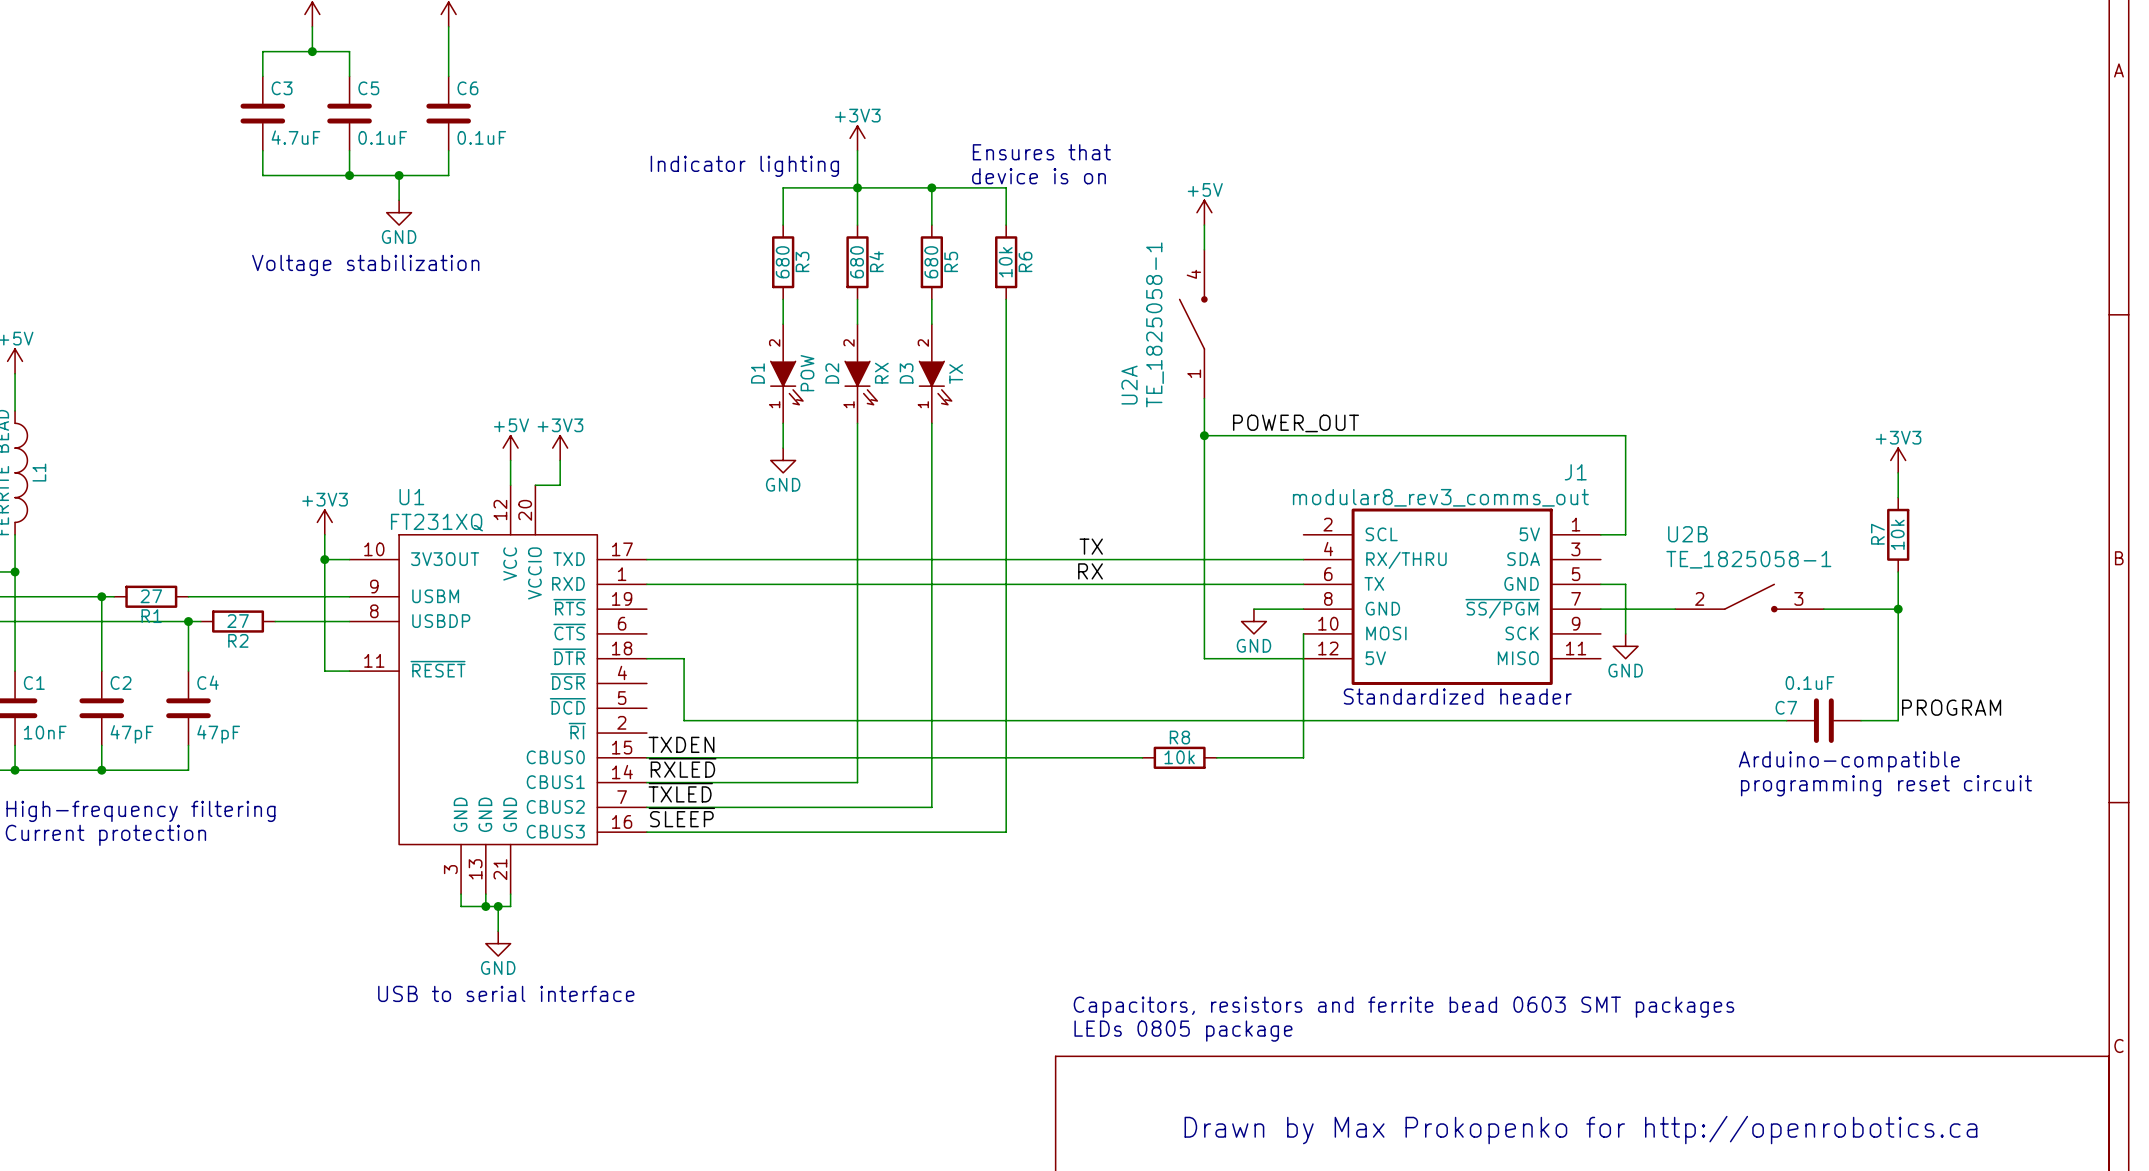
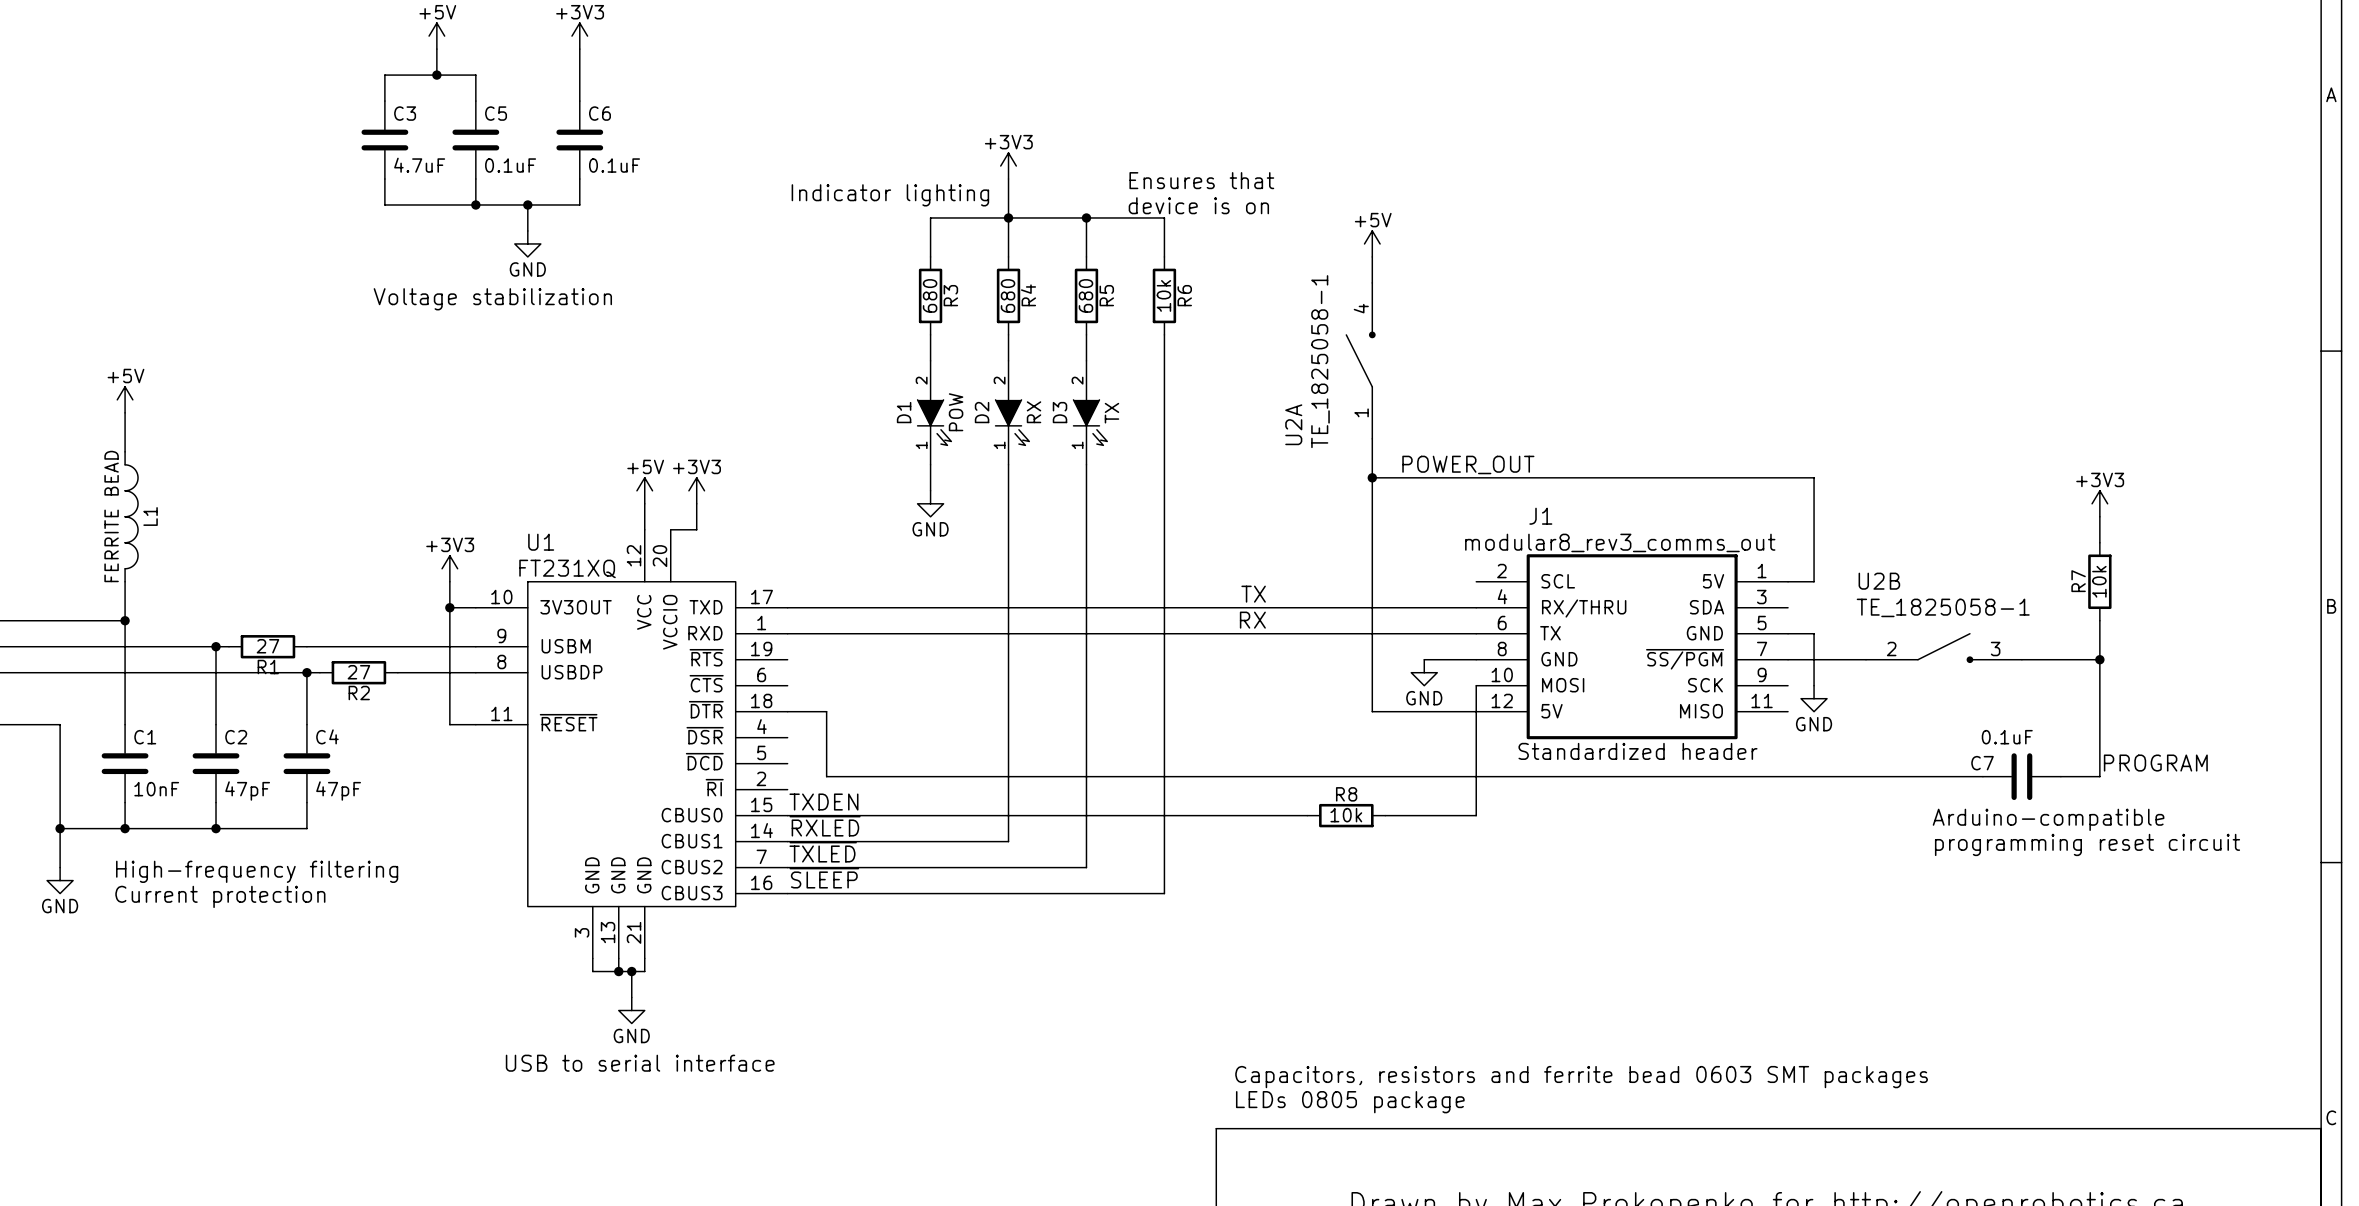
J1 name position: J1 (1575, 472) -> J1 (1540, 516)

